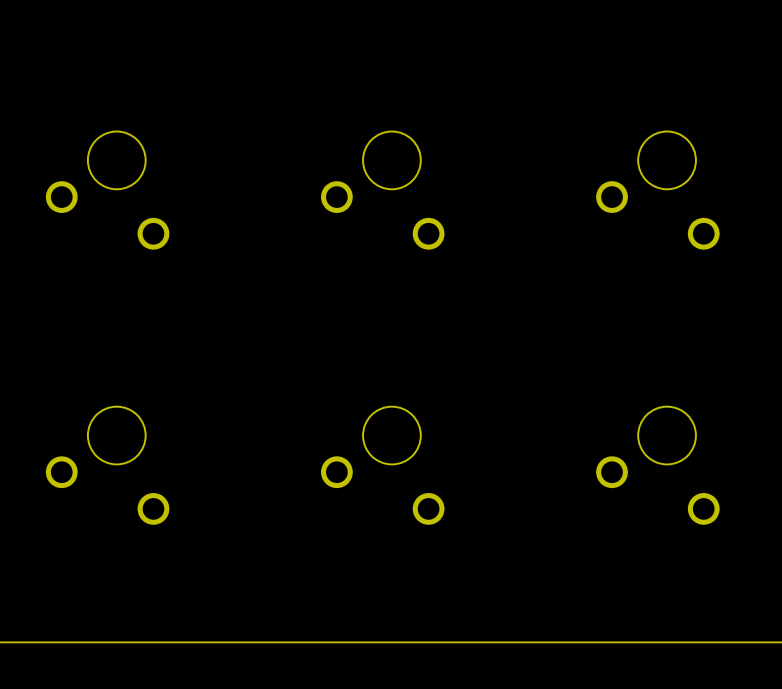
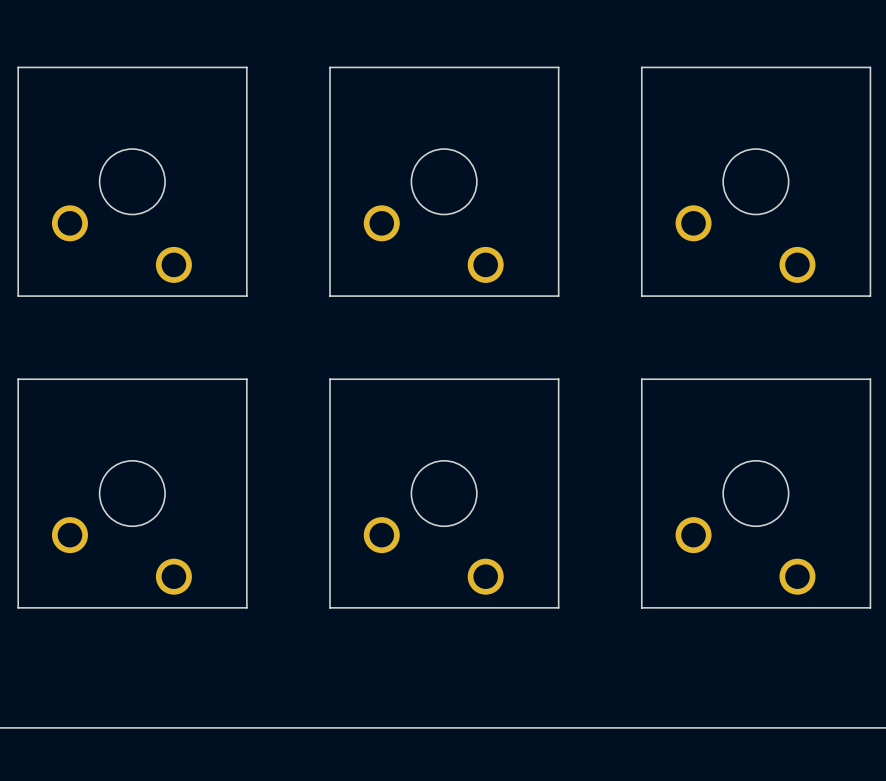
board edge: none -> (246, 67) (246, 296) (18, 296) (18, 67) (246, 67)
board edge: none -> (558, 67) (558, 296) (330, 296) (330, 67) (558, 67)
board edge: none -> (870, 67) (870, 296) (641, 296) (641, 67) (870, 67)
board edge: none -> (246, 379) (246, 607) (18, 607) (18, 379) (246, 379)
board edge: none -> (558, 379) (330, 379) (330, 607) (558, 607) (558, 379)
board edge: none -> (870, 379) (641, 379) (641, 607) (870, 607) (870, 379)

